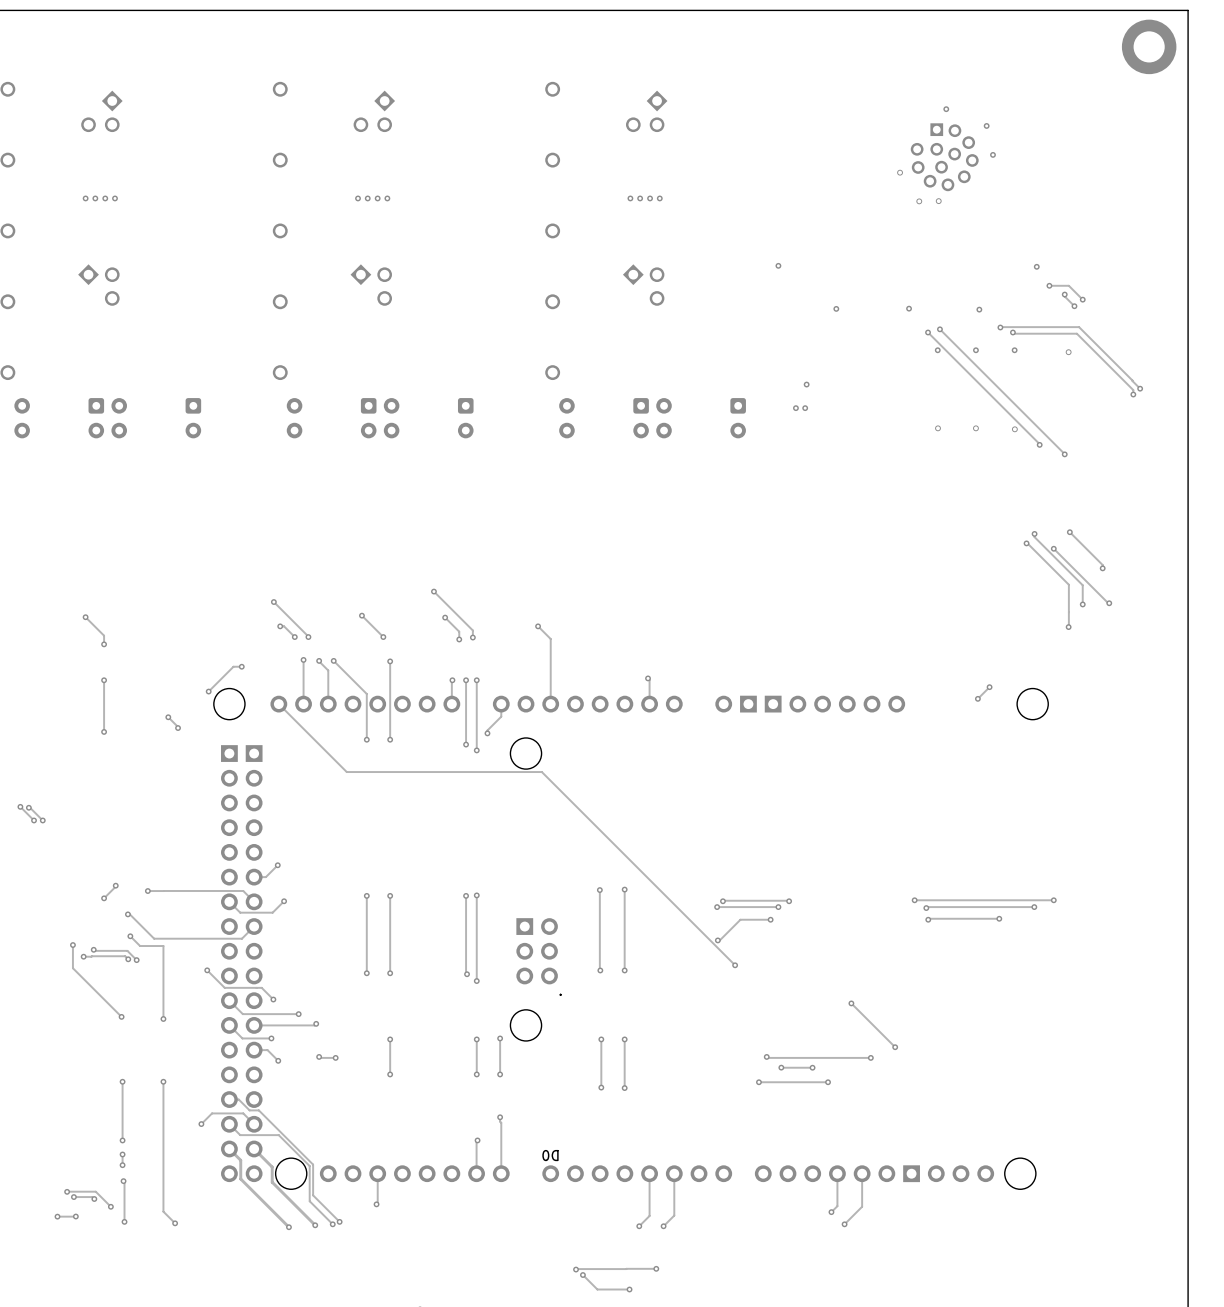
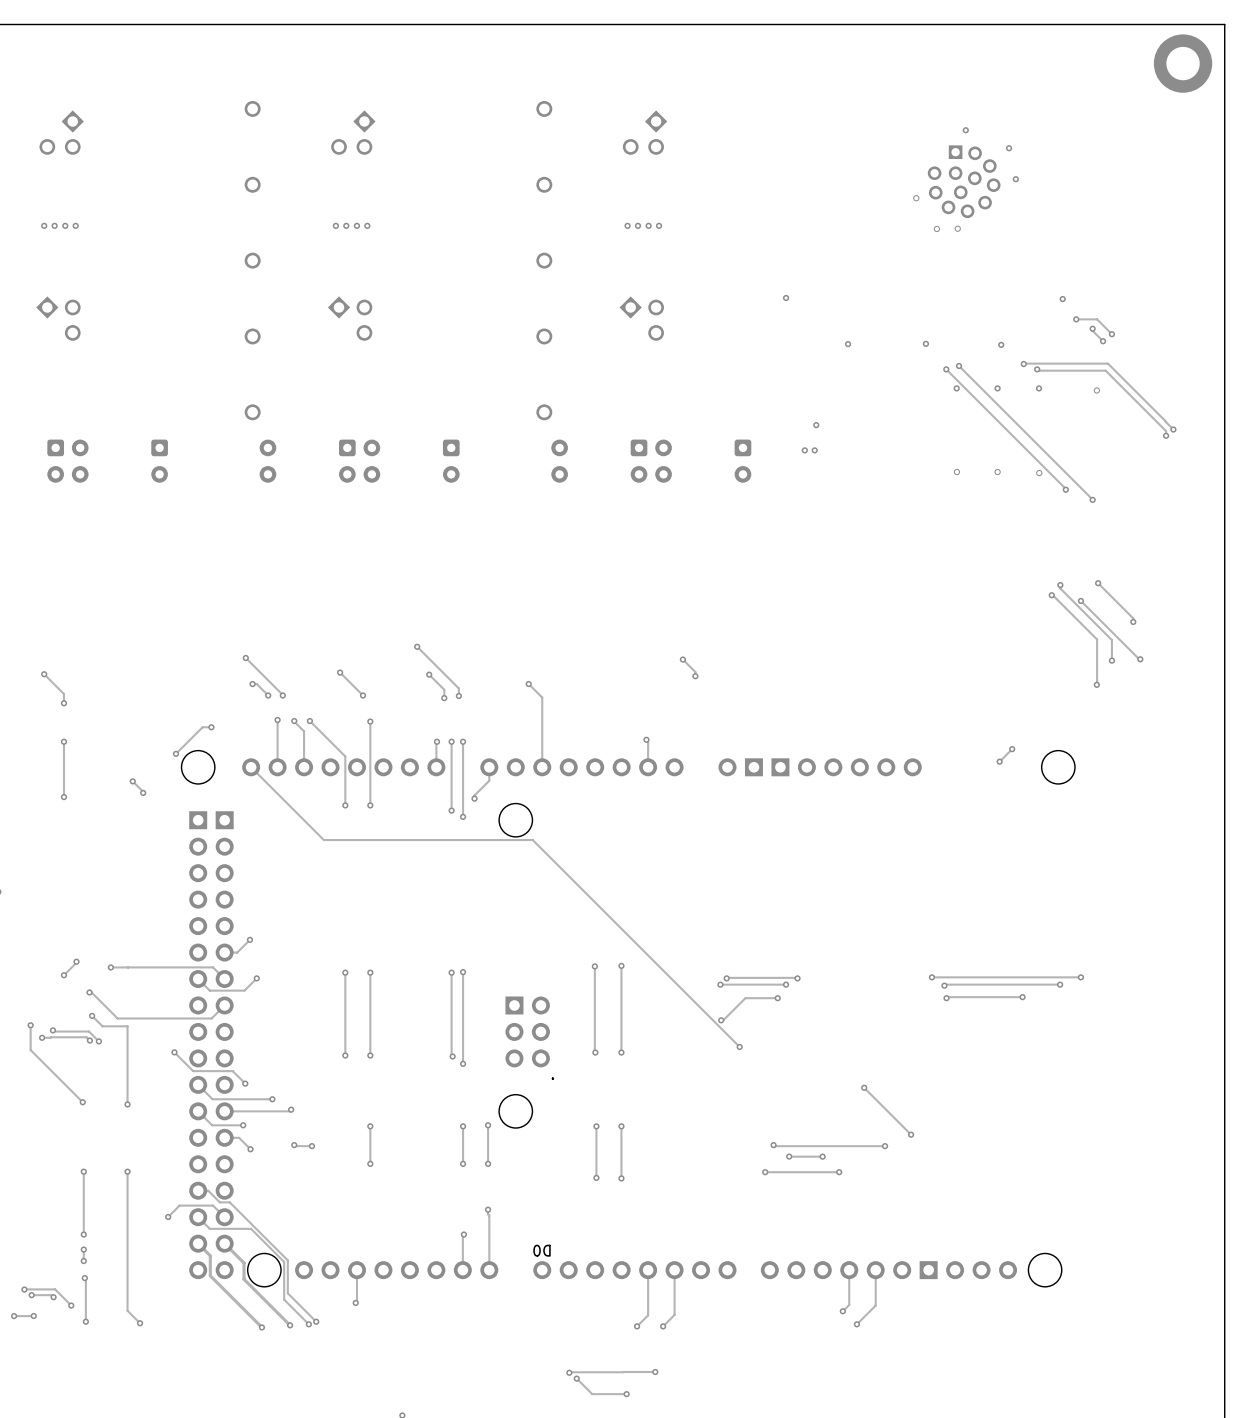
track: none -> (682, 659) (695, 672) (695, 676)
via: none -> (682, 659)
via: none -> (695, 676)

